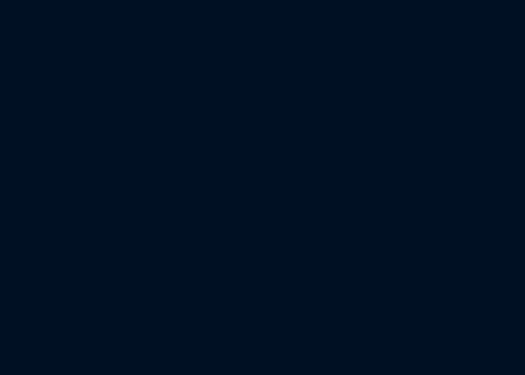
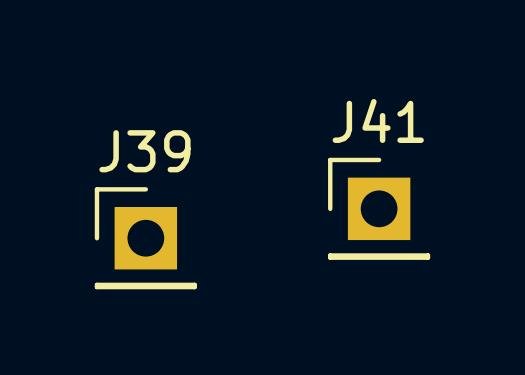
J41: none -> (379, 208)
J39: none -> (145, 238)

